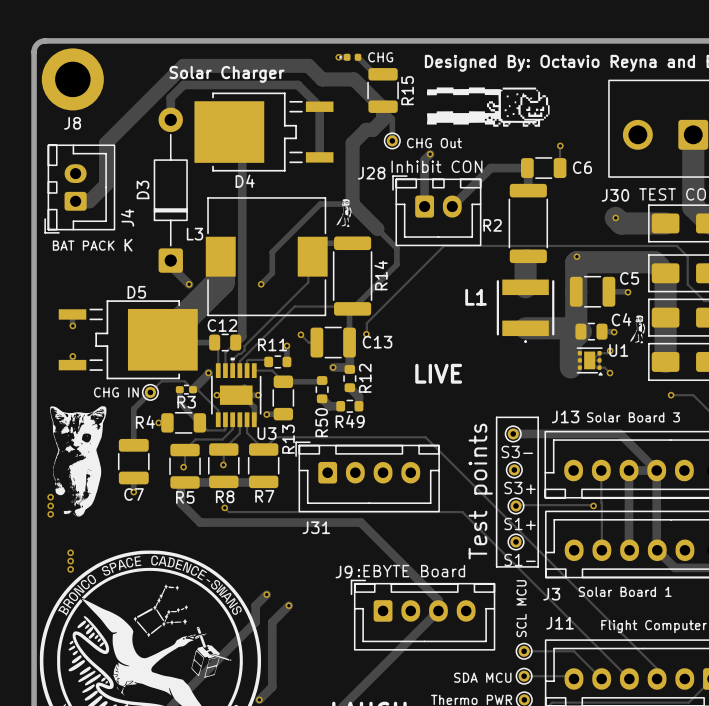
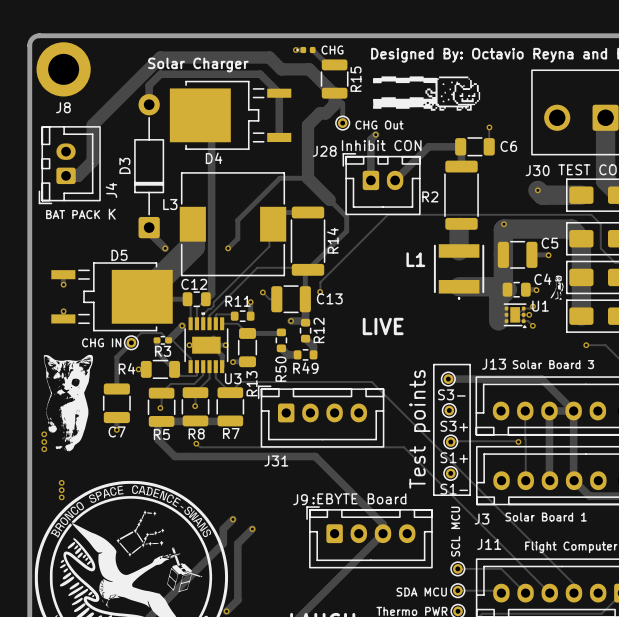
drawing: [336, 199, 352, 228] -> none
via: none -> (529, 314)

